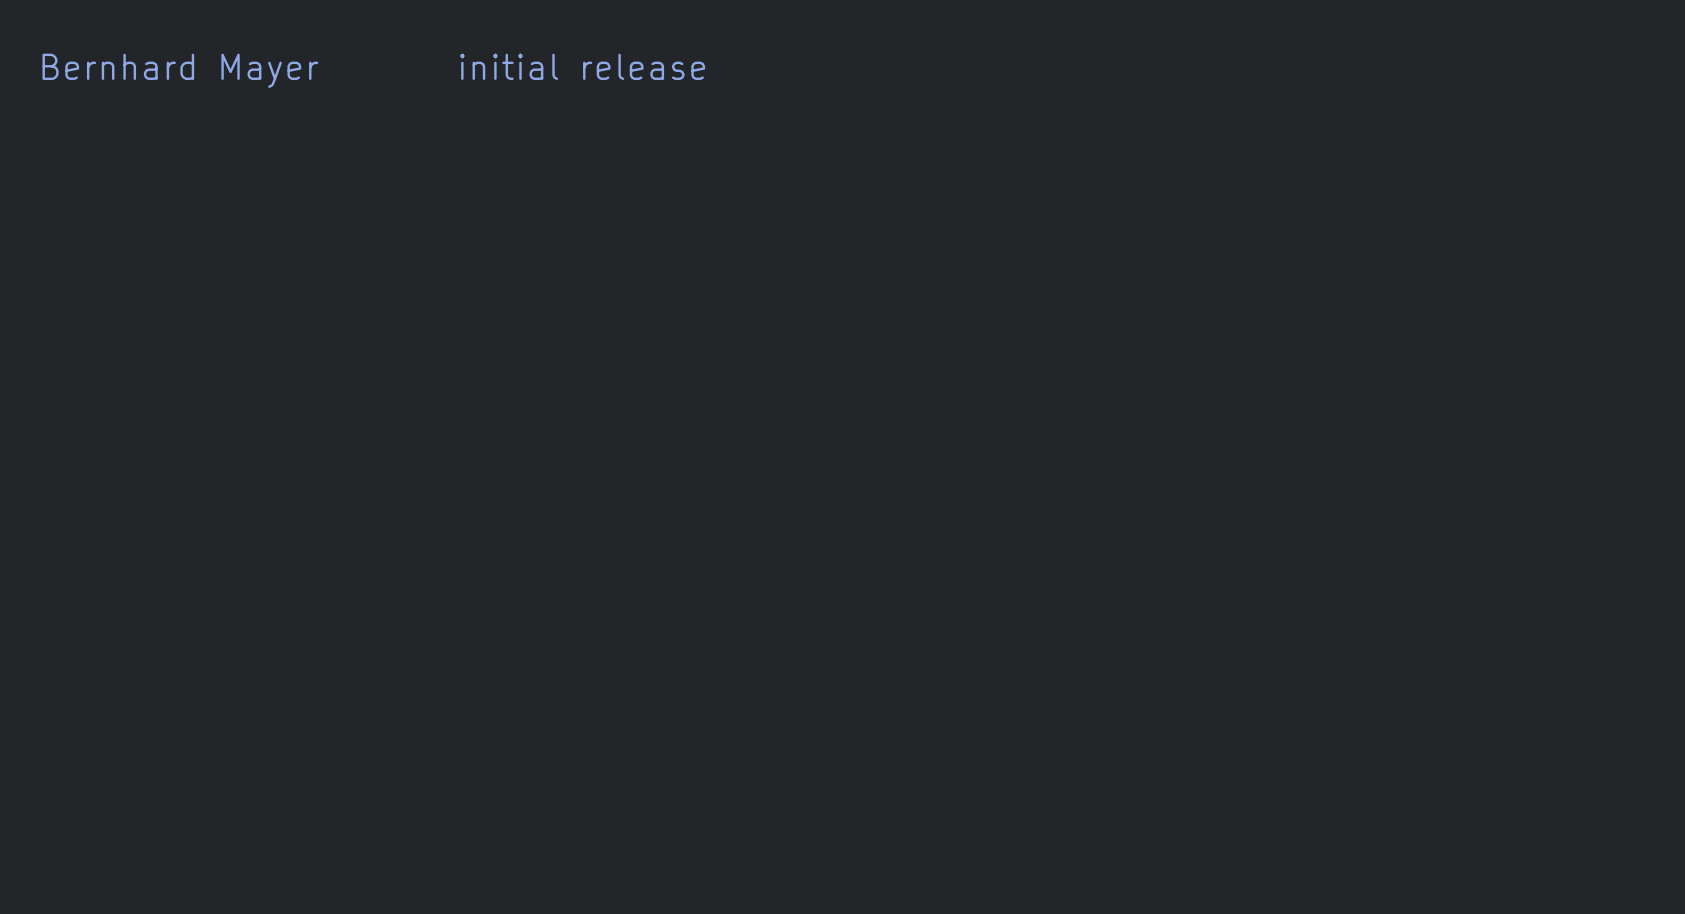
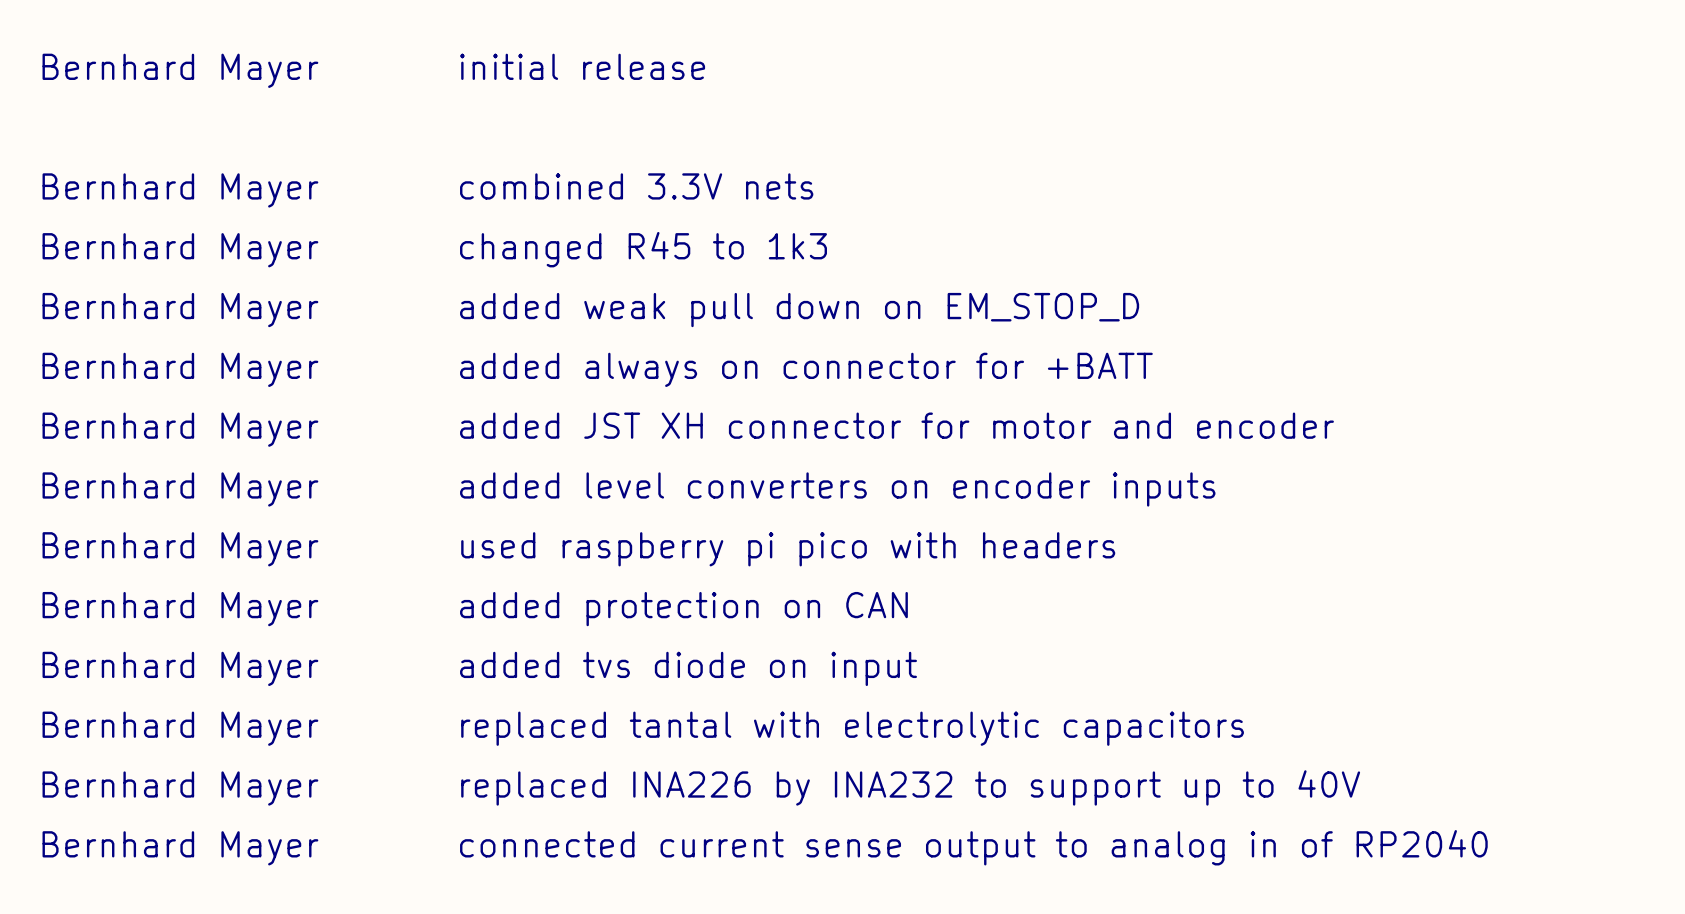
text: none -> combined 3.3V nets (636, 186)
text: none -> Bernhard Mayer (180, 190)
text: none -> changed R45 to 1k3 (643, 249)
text: none -> Bernhard Mayer (180, 250)
text: none -> Bernhard Mayer (180, 310)
text: none -> added weak pull down on EM_STOP_D (799, 310)
text: none -> Bernhard Mayer (180, 369)
text: none -> added always on connector for +BATT (806, 369)
text: none -> added JST XH connector for motor and encoder (896, 425)
text: none -> Bernhard Mayer (180, 429)
text: none -> Bernhard Mayer (180, 489)
text: none -> added level converters on encoder inputs (837, 489)
text: none -> Bernhard Mayer (180, 549)
text: none -> used raspberry pi pico with headers (788, 549)
text: none -> Bernhard Mayer (180, 609)
text: none -> added protection on CAN (683, 609)
text: none -> Bernhard Mayer (180, 668)
text: none -> added tvs diode on input (688, 668)
text: none -> Bernhard Mayer (180, 728)
text: none -> replaced tantal with electrolytic capacitors (852, 728)
text: none -> replaced INA226 by INA232 to support up to 40V (910, 787)
text: none -> Bernhard Mayer (180, 788)
text: none -> connected current sense output to analog in of RP2040 (973, 847)
text: none -> Bernhard Mayer (180, 848)

